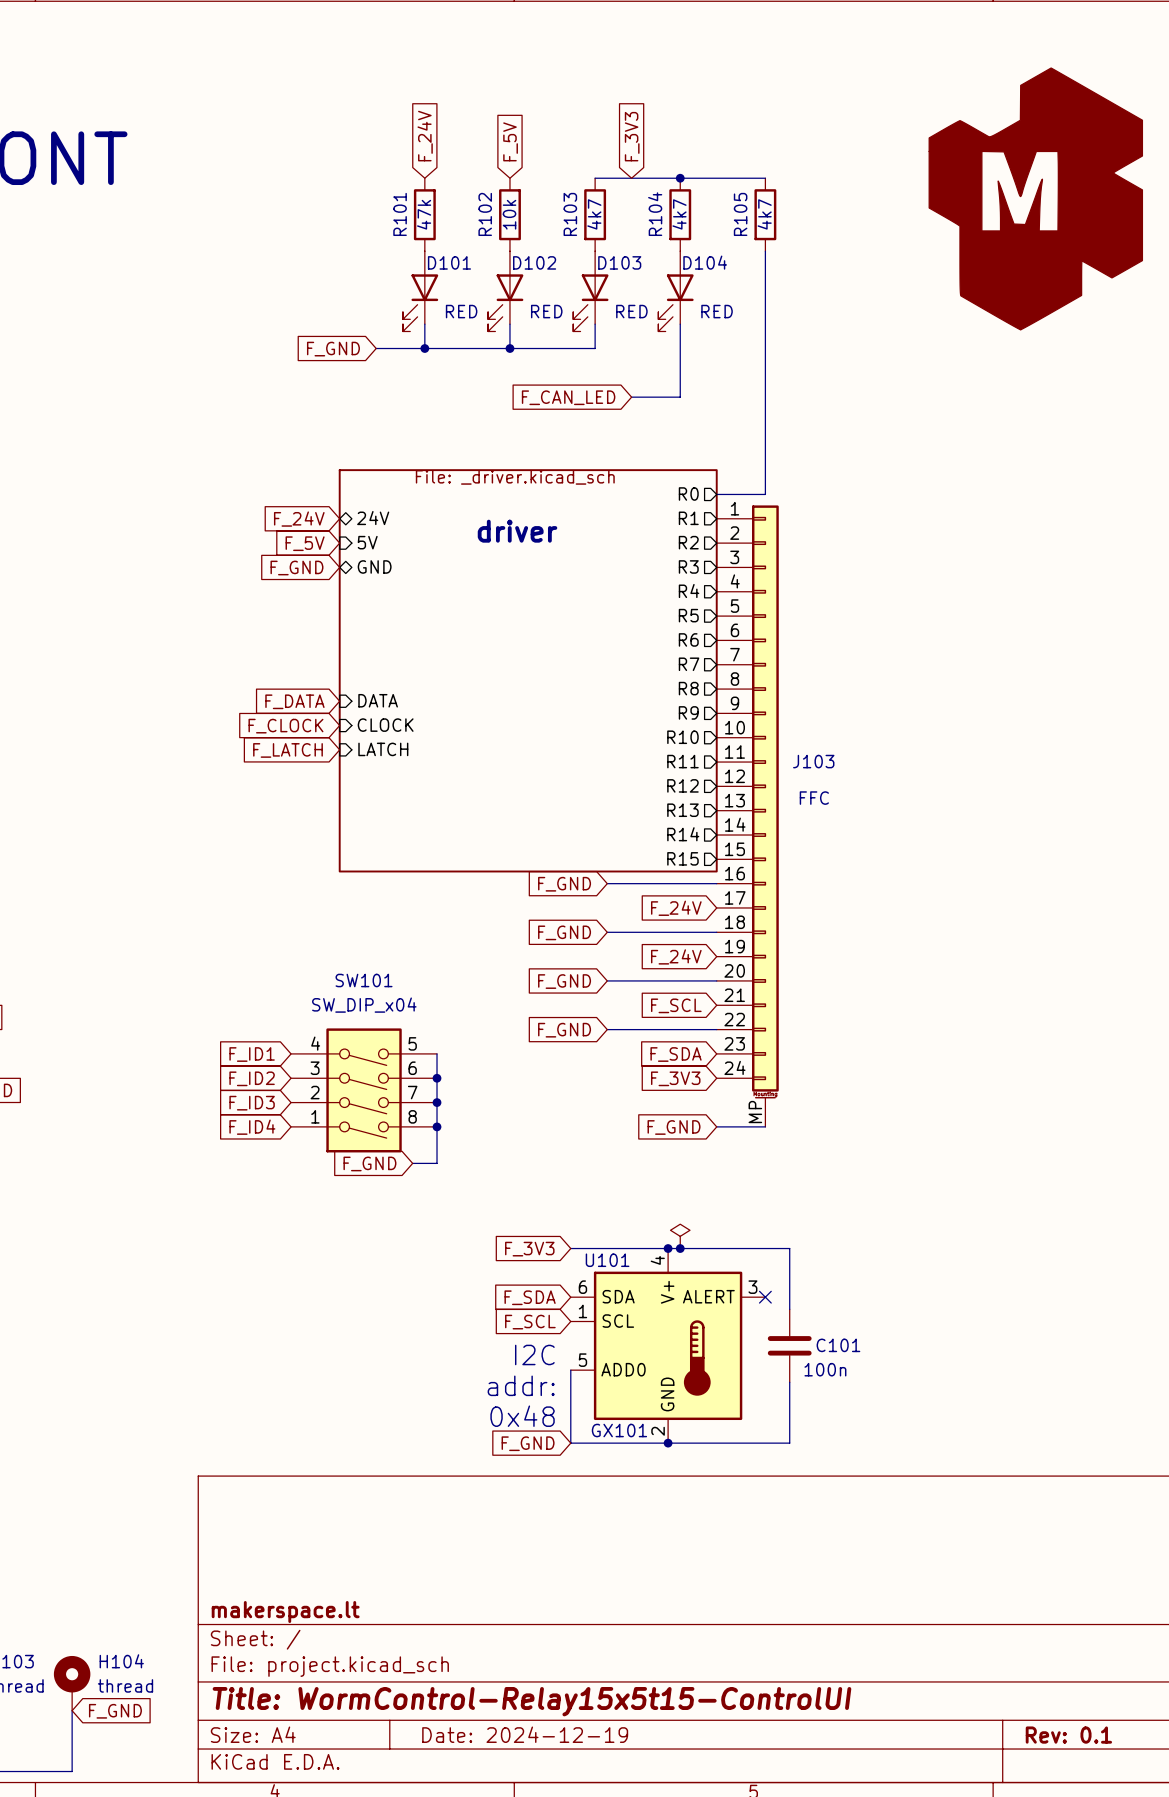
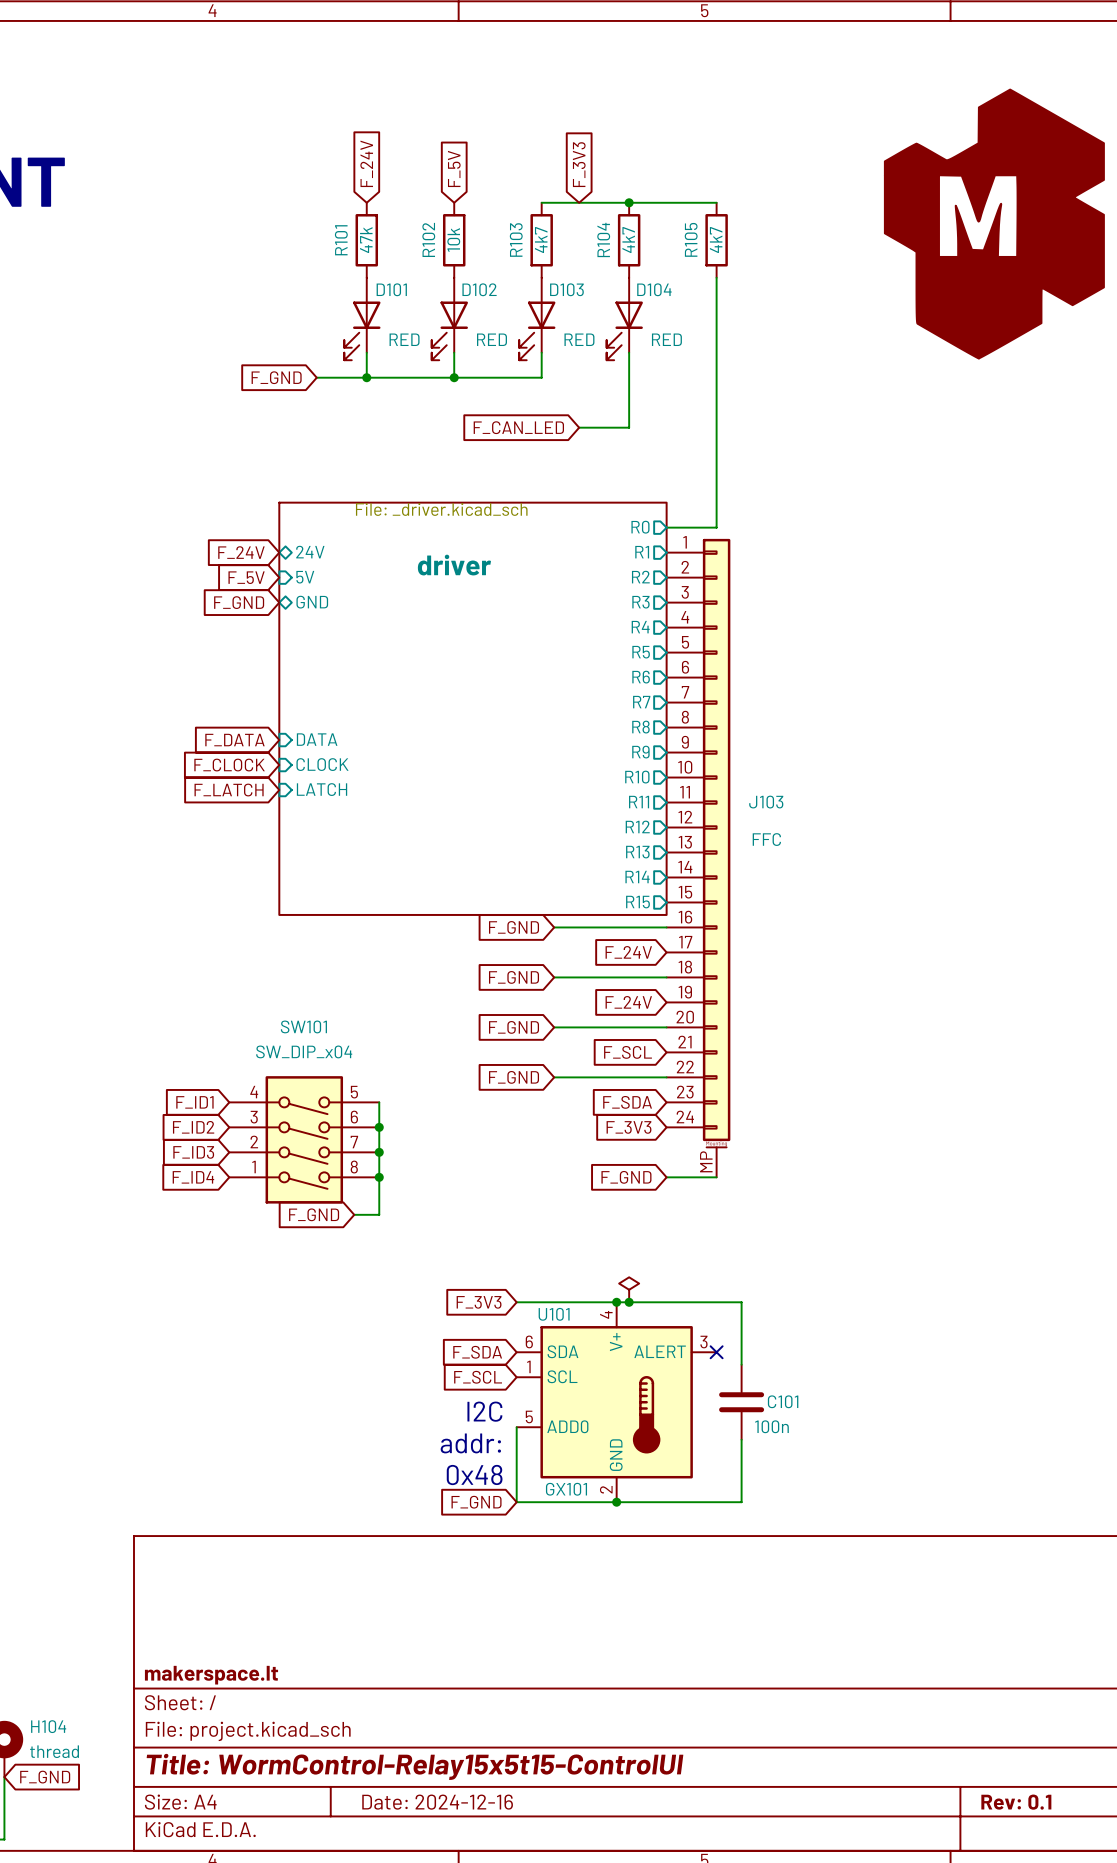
title block: Date: 2024-12-19 (525, 1734) -> Date: 2024-12-16 (437, 1802)

